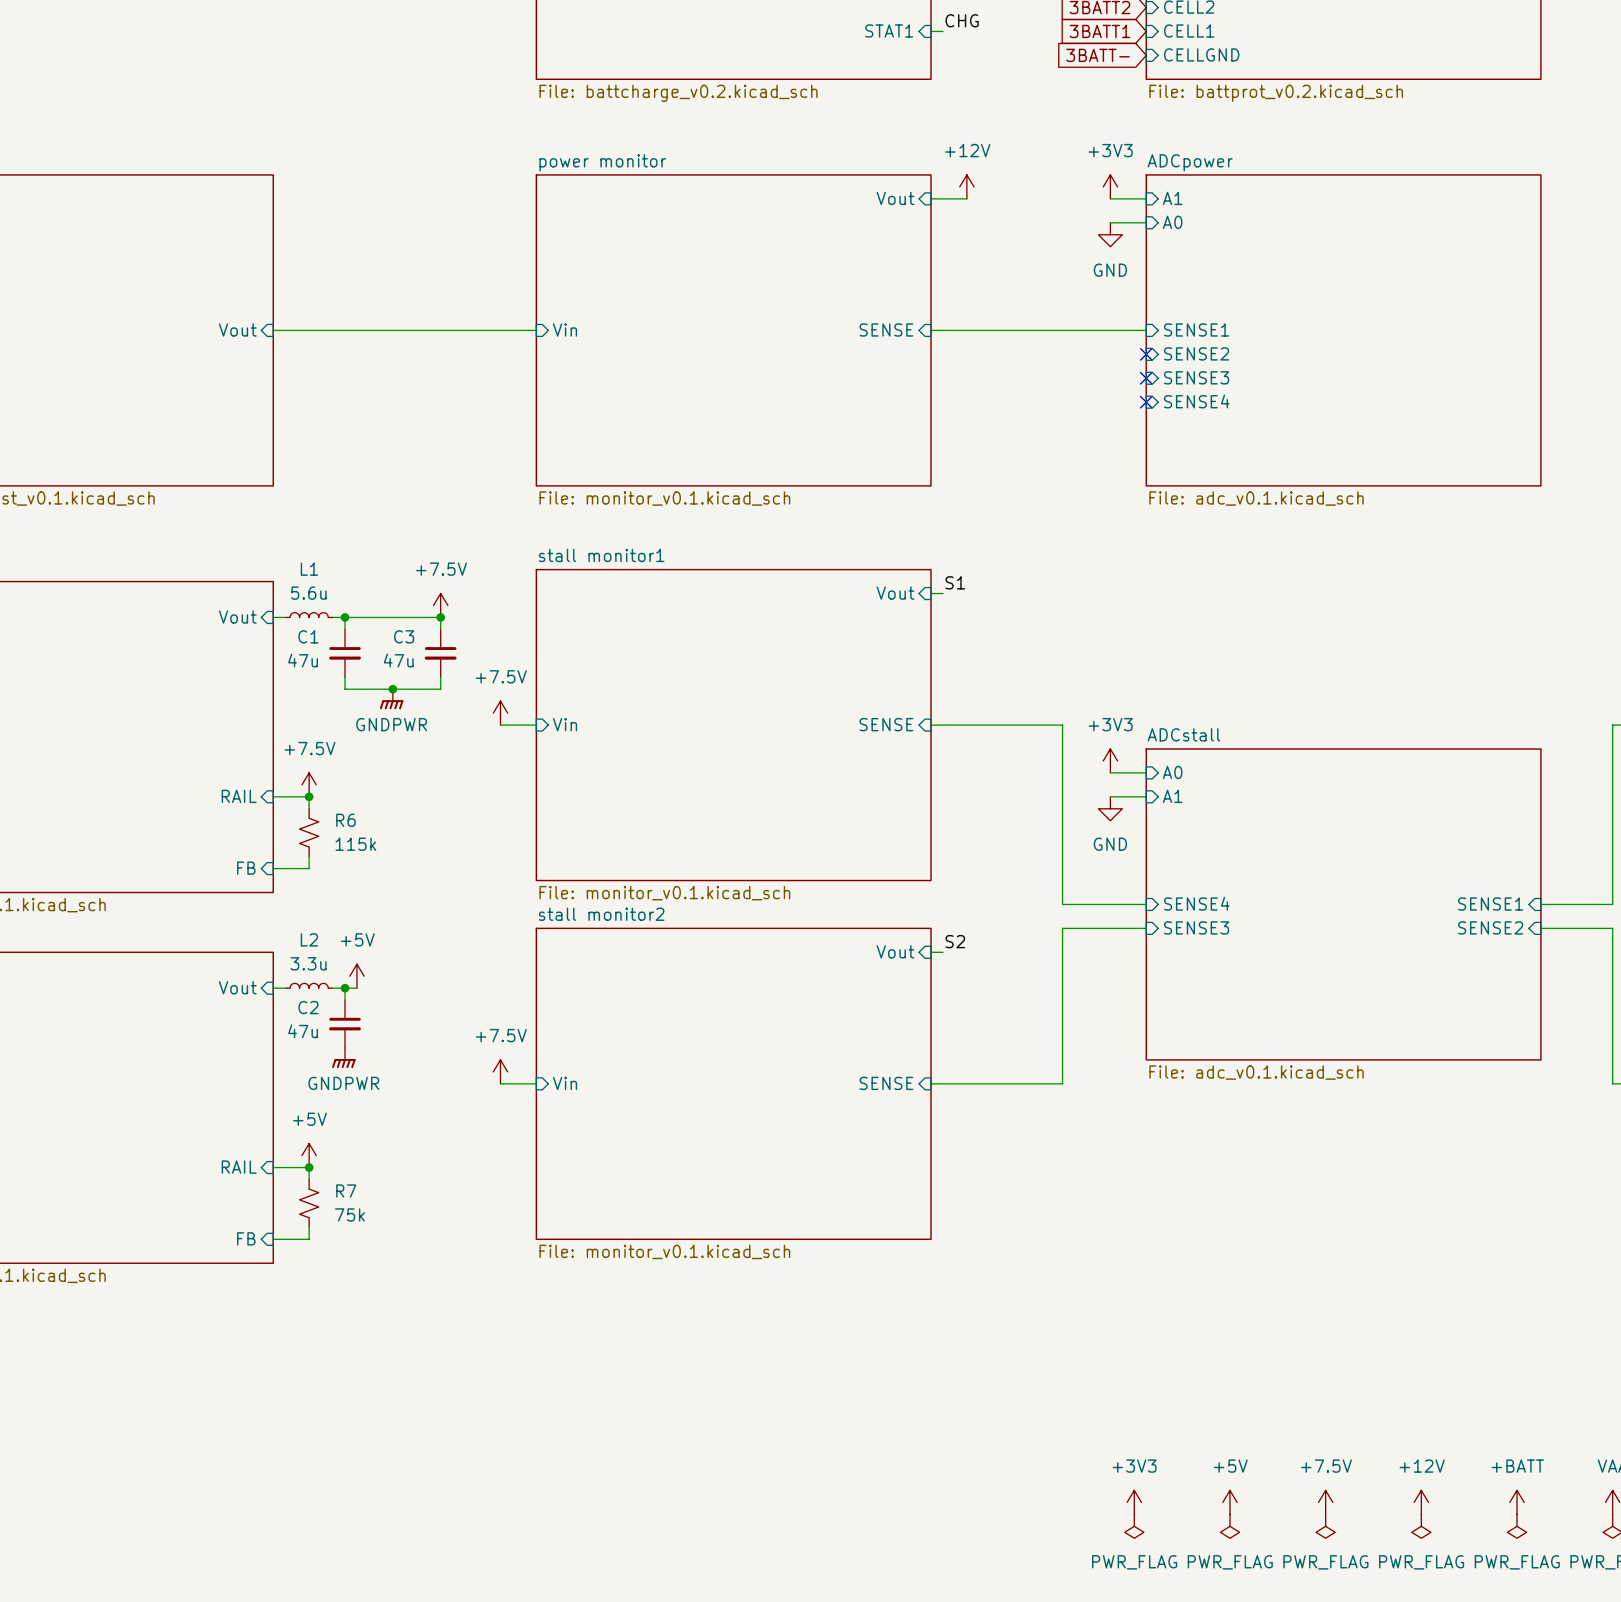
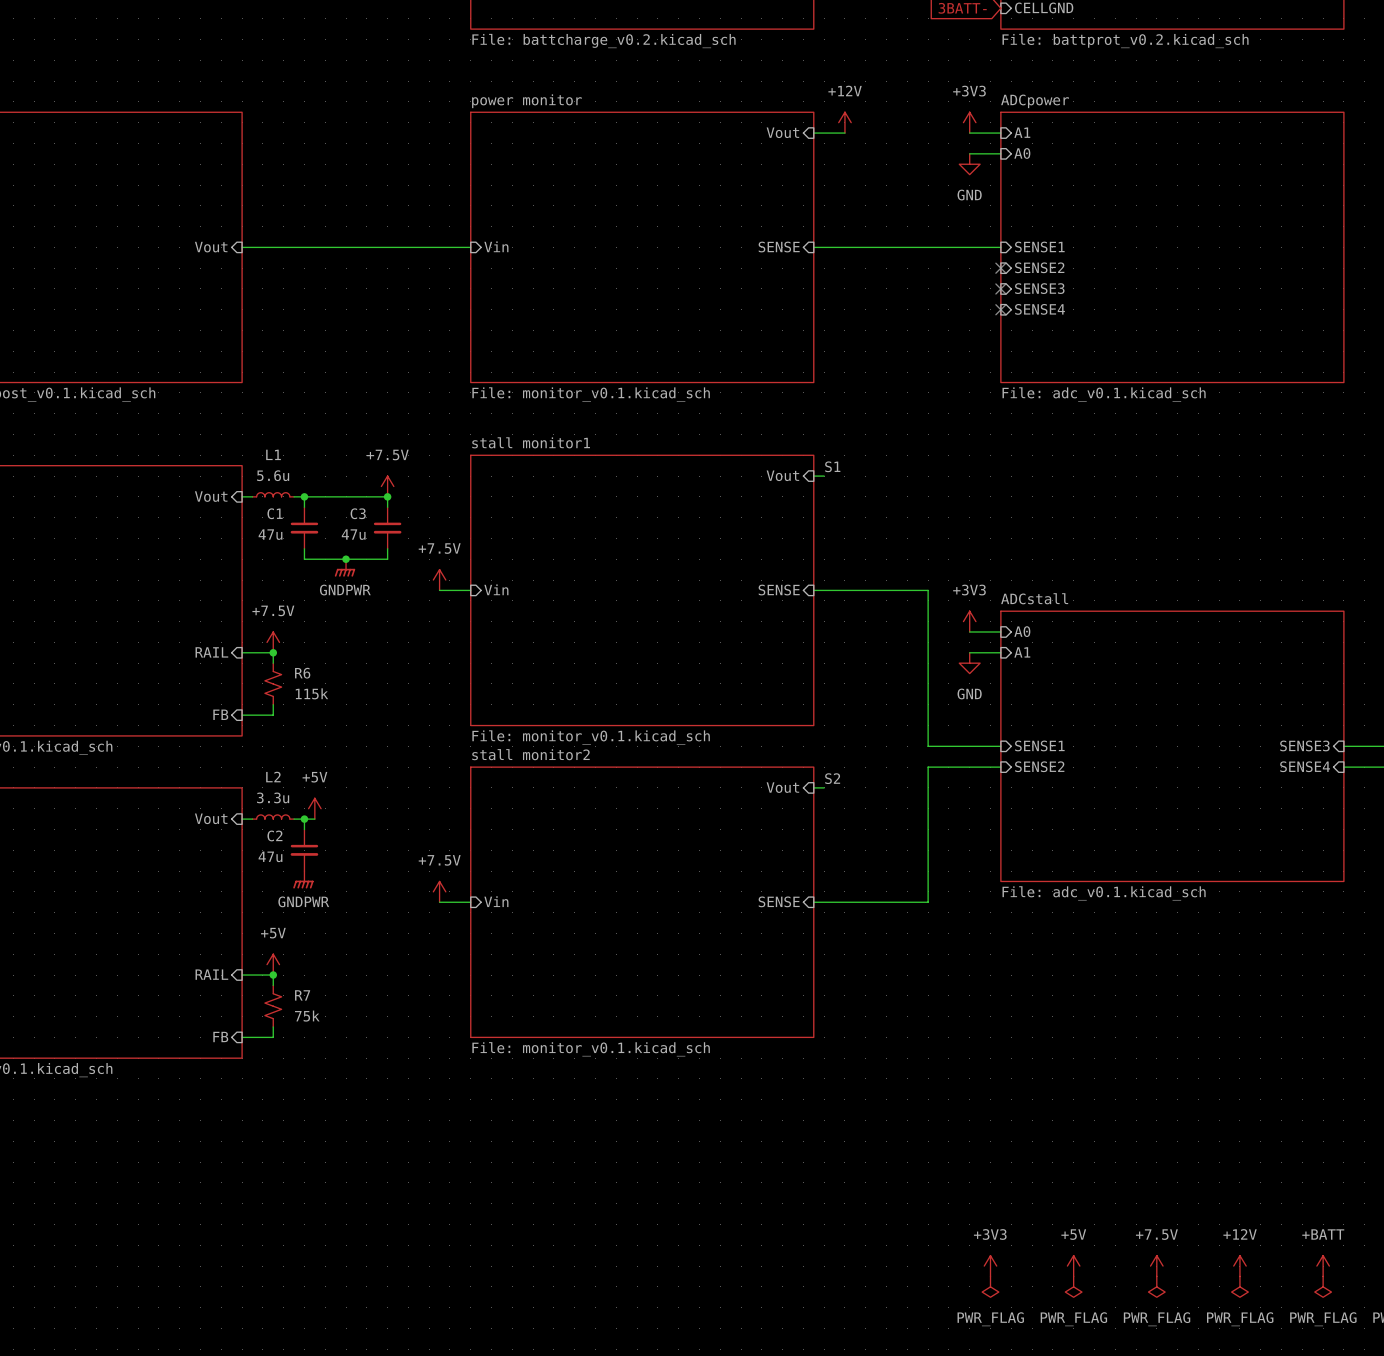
sheet pin: SENSE4 (1196, 903) -> SENSE1 (1039, 745)
sheet pin: SENSE1 (1490, 904) -> SENSE3 (1304, 745)
sheet pin: SENSE3 (1196, 927) -> SENSE2 (1039, 766)
sheet pin: SENSE2 (1490, 927) -> SENSE4 (1305, 766)

